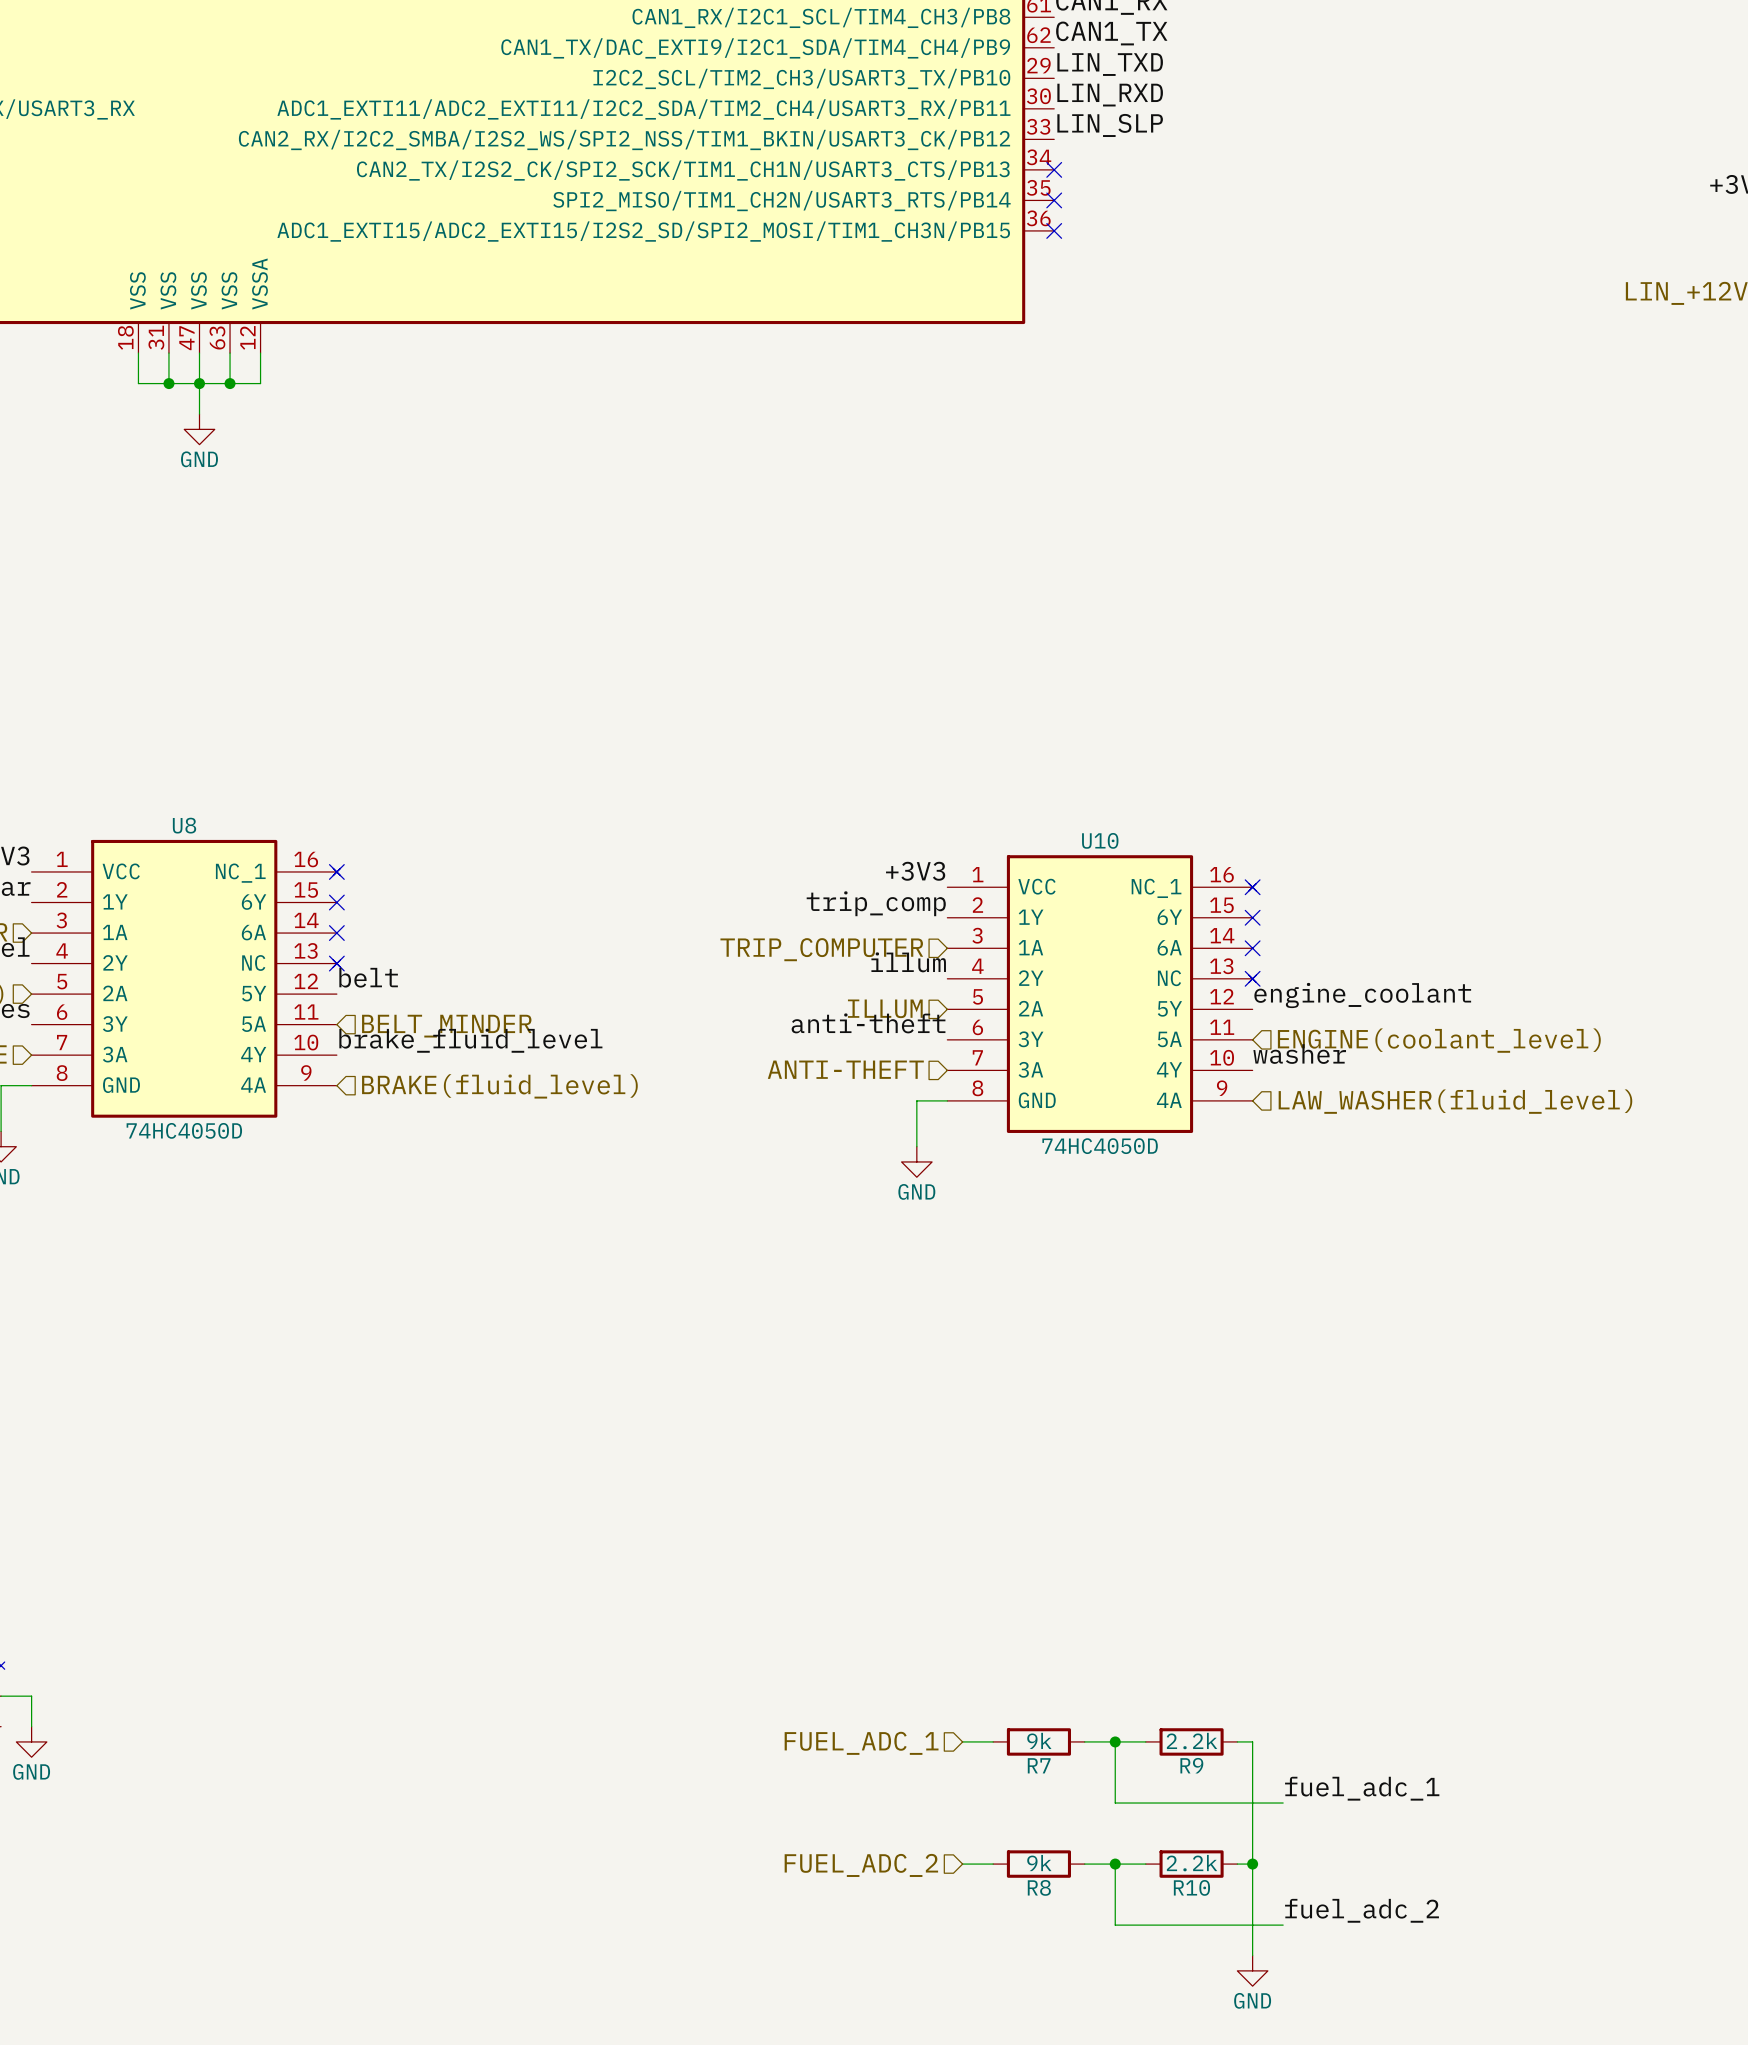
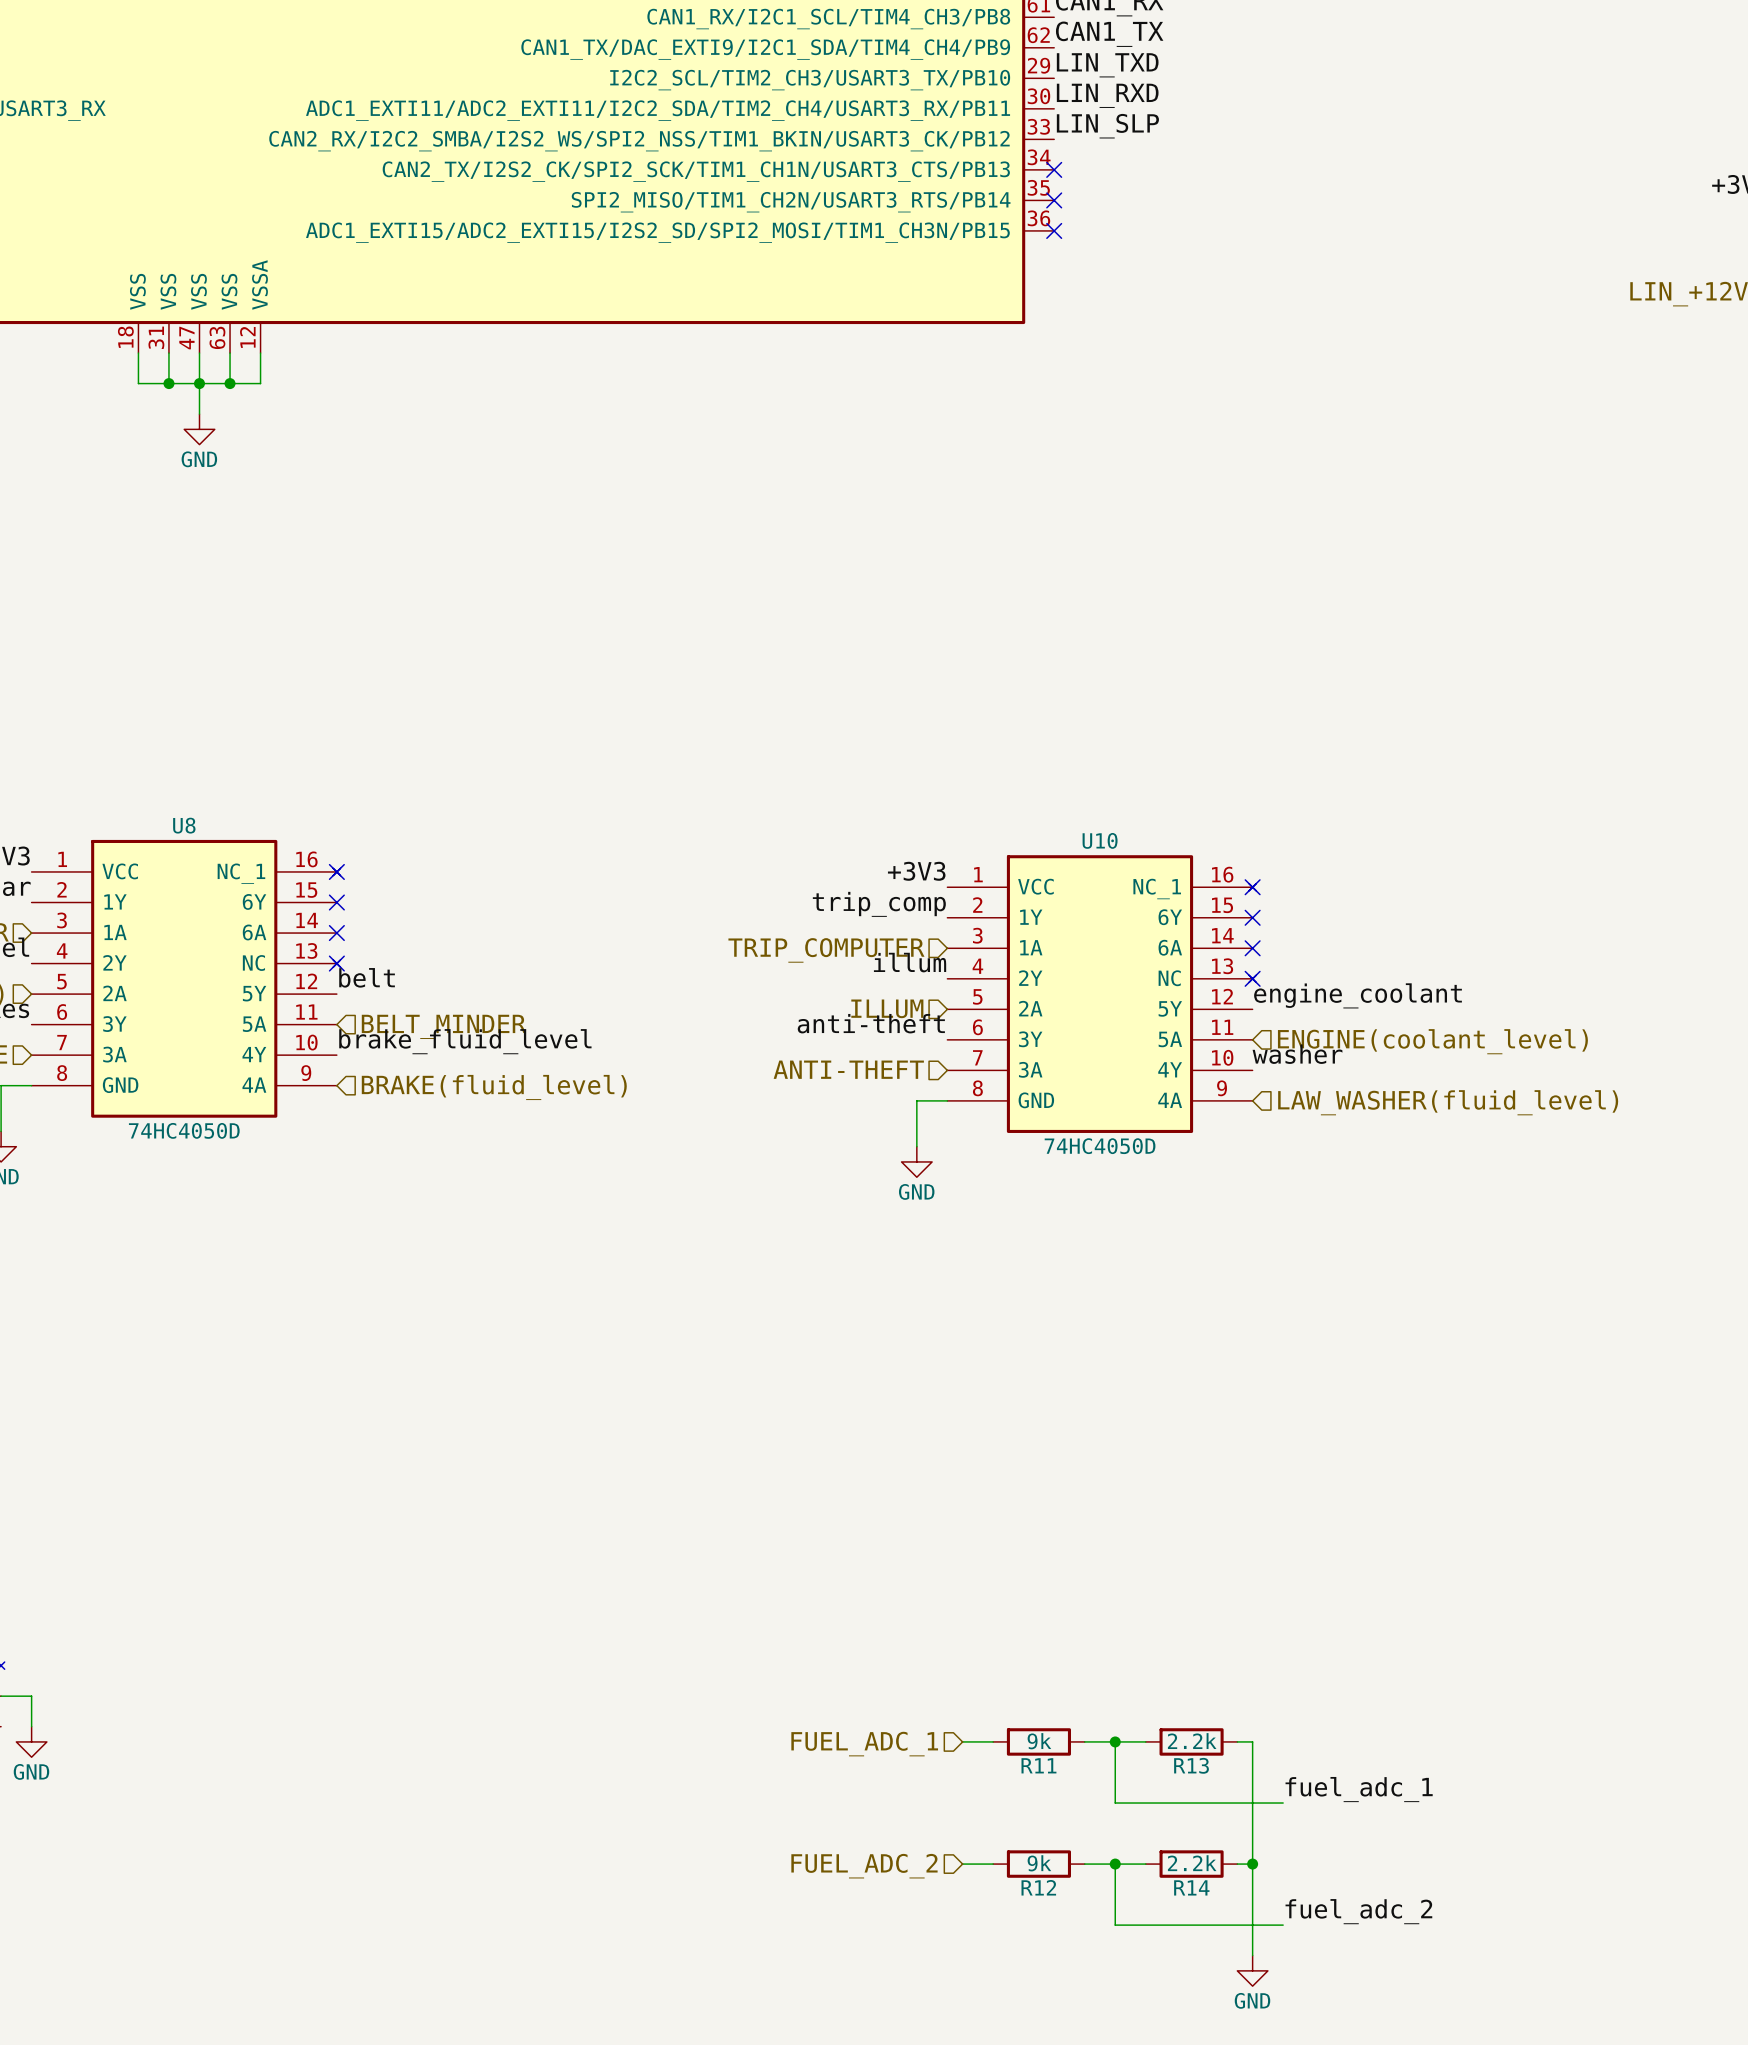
R7 name: R7 (1039, 1765) -> R11 (1038, 1765)
R9 name: R9 (1191, 1765) -> R13 (1191, 1765)
R8 name: R8 (1039, 1887) -> R12 (1038, 1887)
R10 name: R10 (1191, 1887) -> R14 (1191, 1887)

